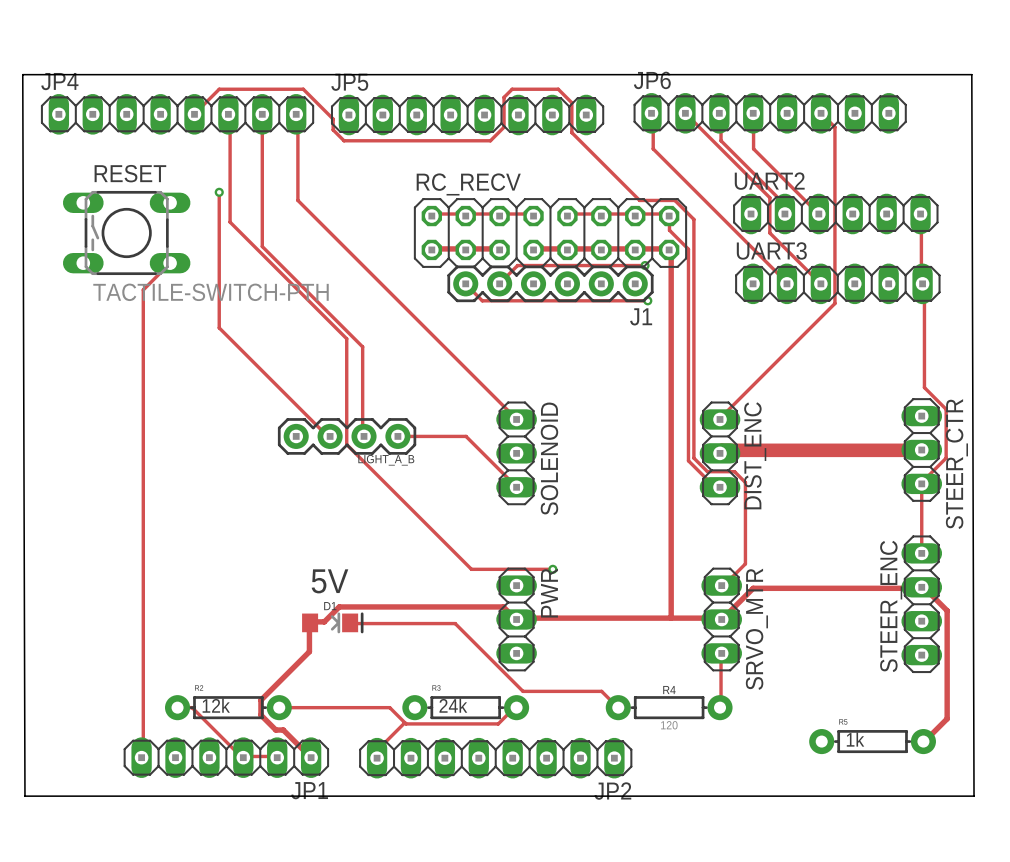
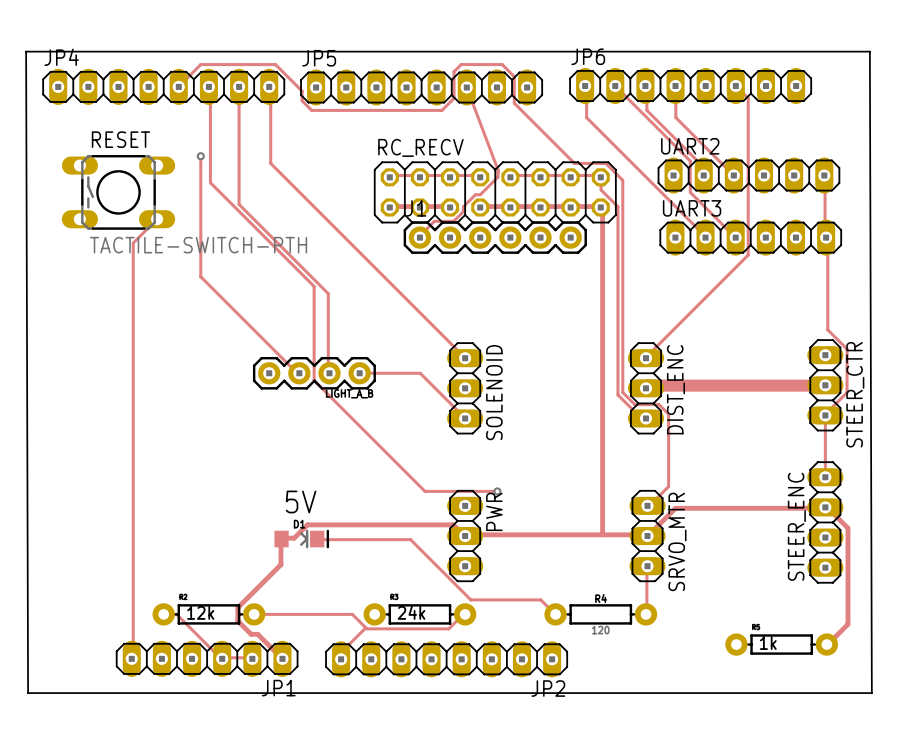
track: (645, 265) (517, 265) (499, 283) -> none
via: (645, 265) -> none
track: (465, 283) (482, 300) (647, 300) -> (419, 237) (434, 221) (453, 221) (463, 211) (463, 206) (475, 194) (480, 194) (498, 177) (498, 171) (466, 87)
via: (647, 300) -> none
J1 name position: J1 (641, 316) -> J1 (416, 208)

